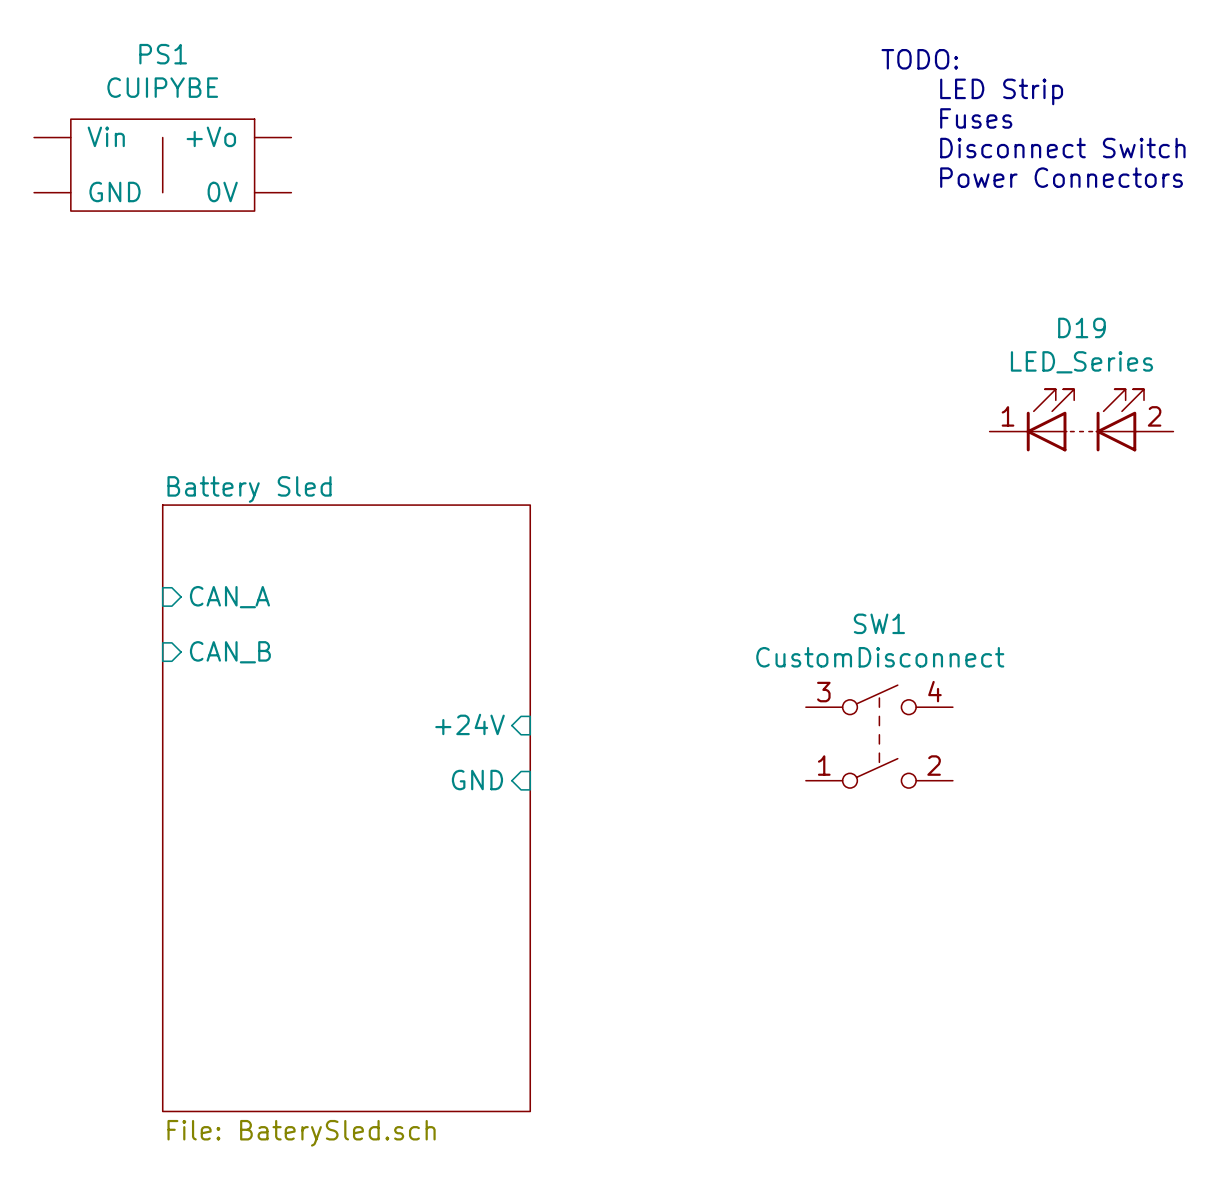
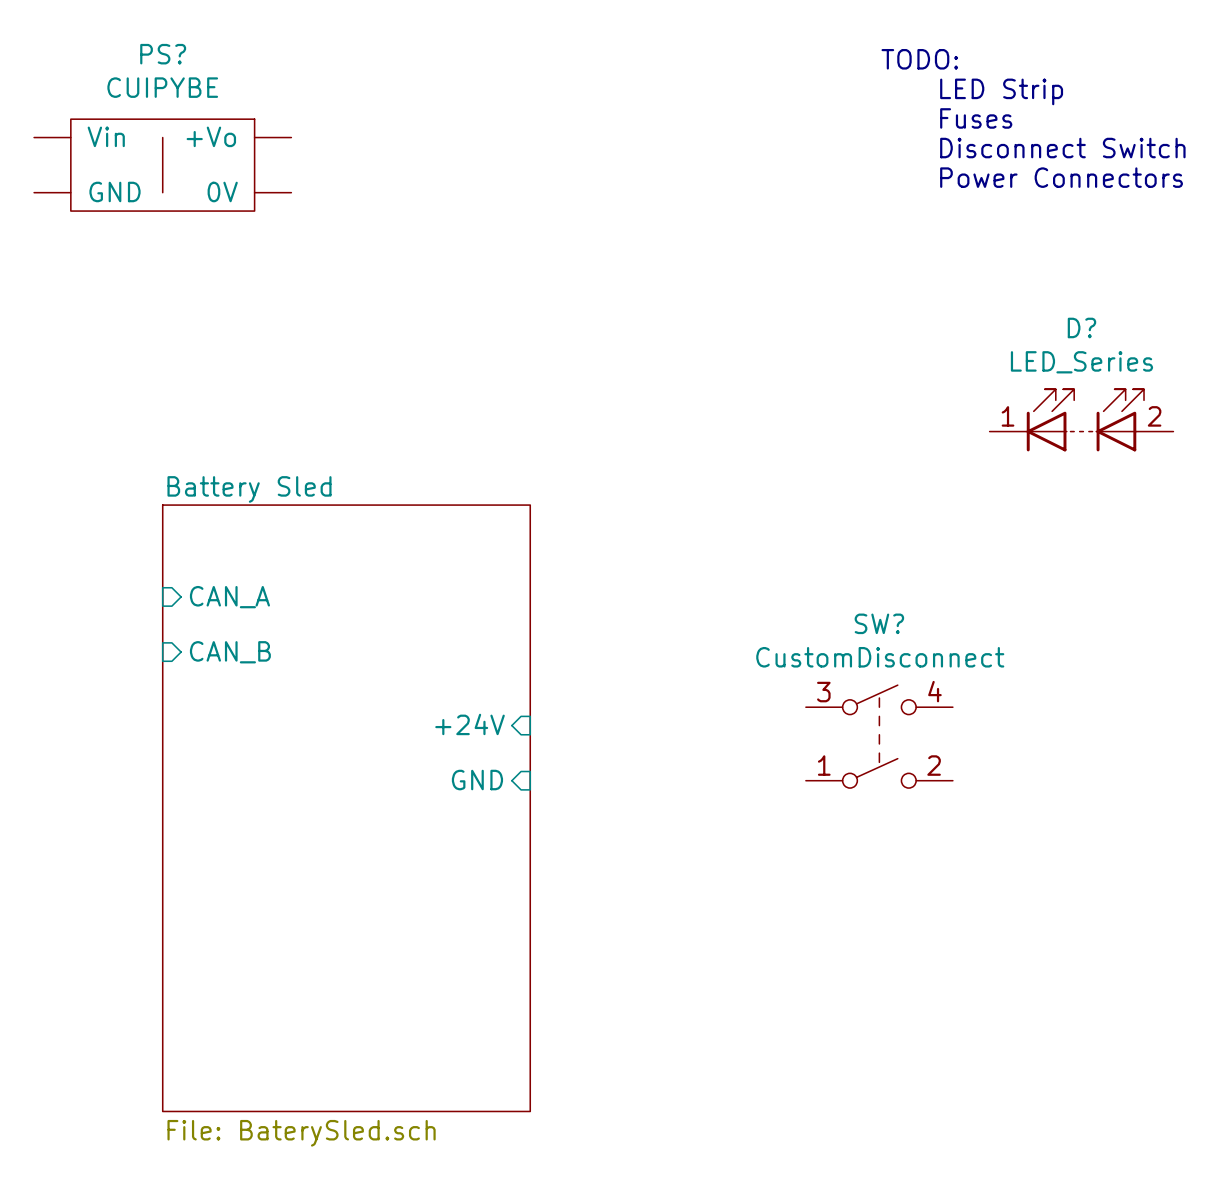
PS1 name: PS1 (163, 54) -> PS? (163, 54)
D19 name: D19 (1081, 327) -> D? (1081, 327)
SW1 name: SW1 (879, 623) -> SW? (879, 623)

